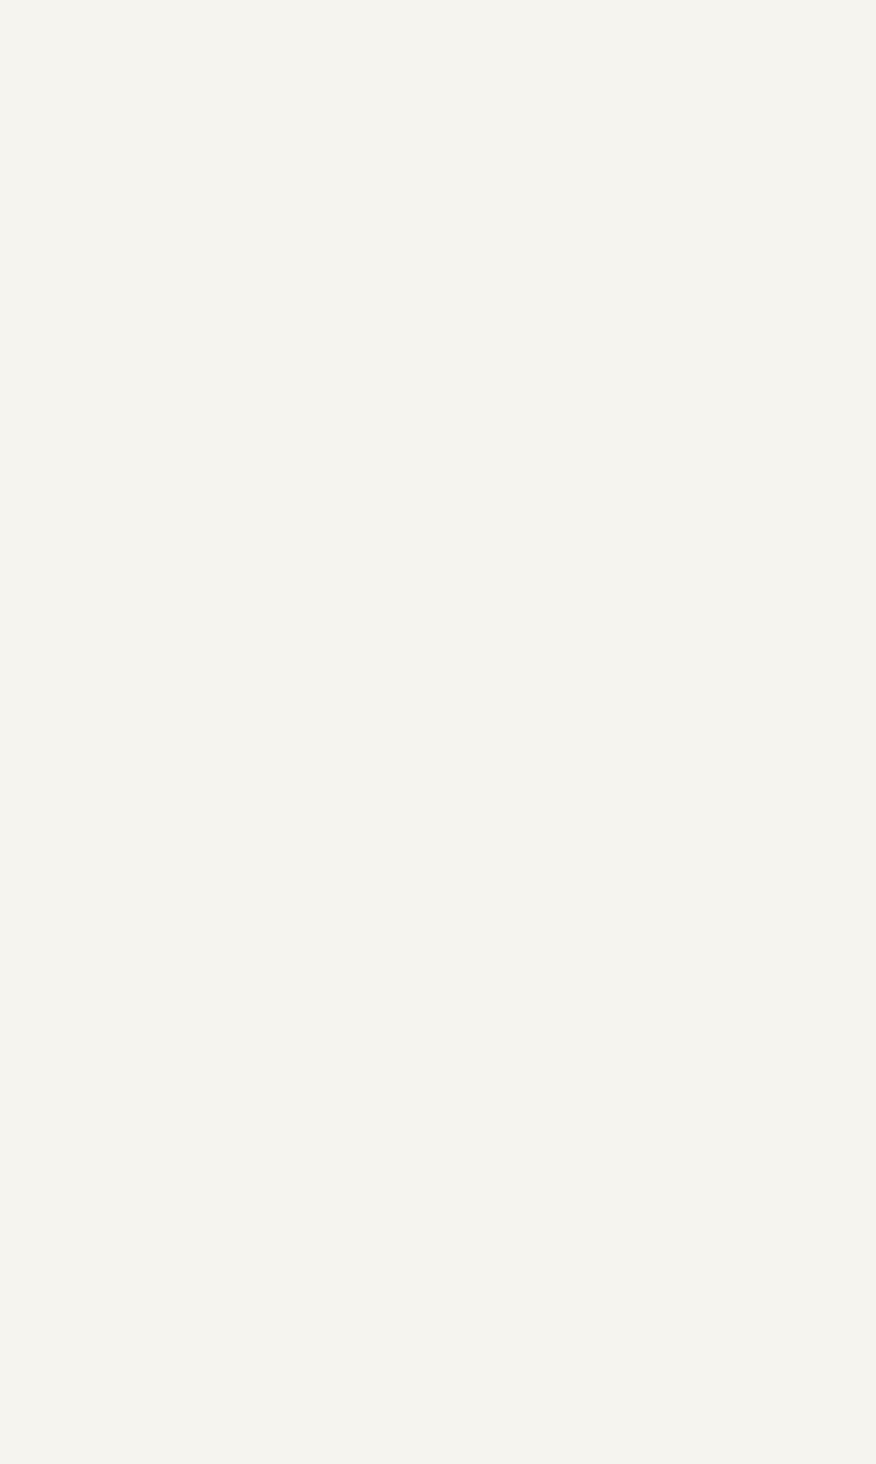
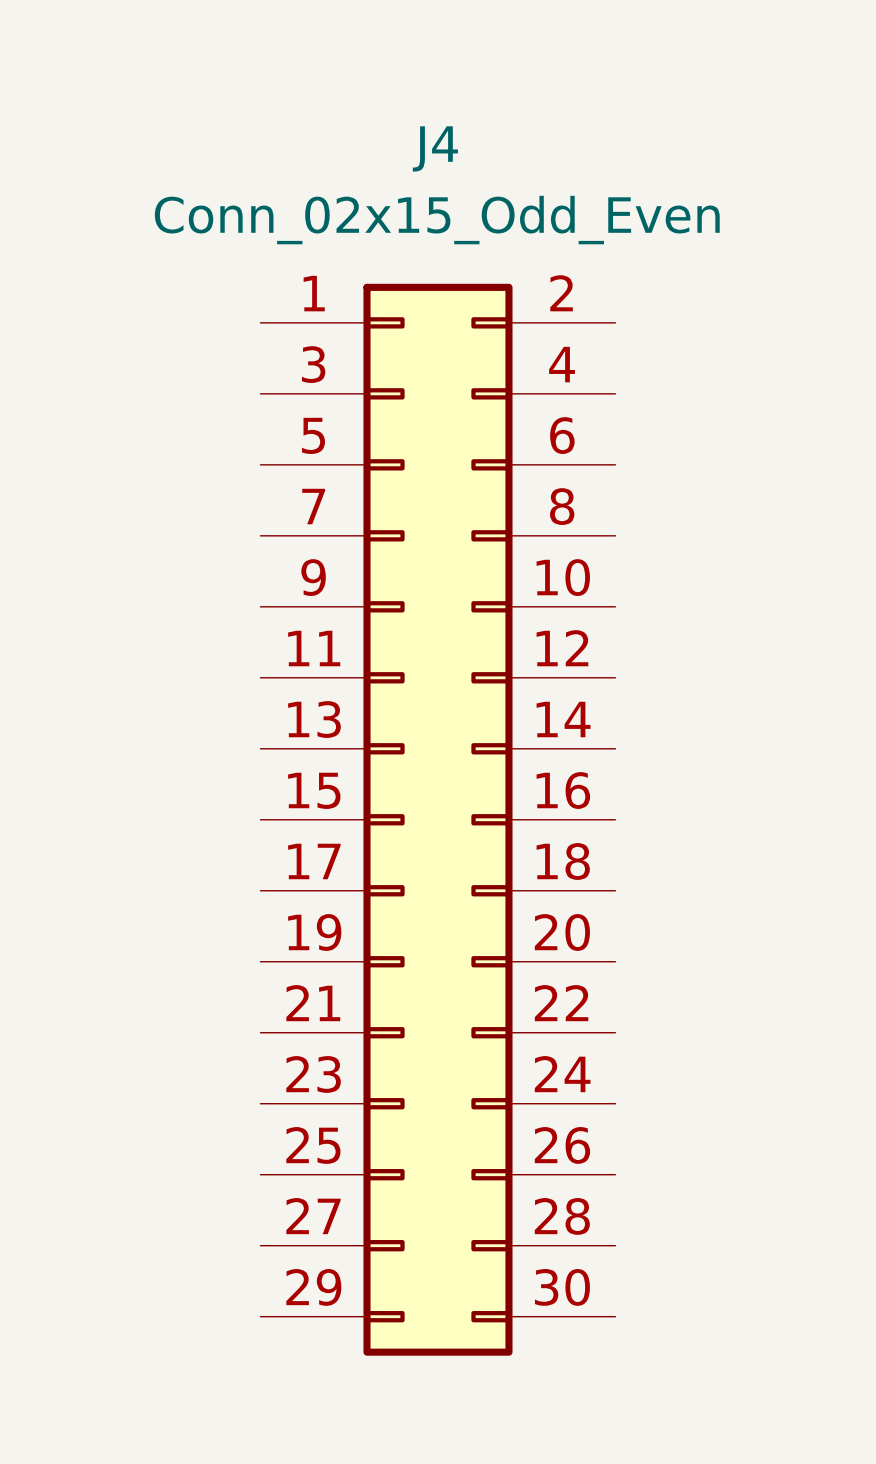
J4: none -> Conn_02x15_Odd_Even (437, 819)

